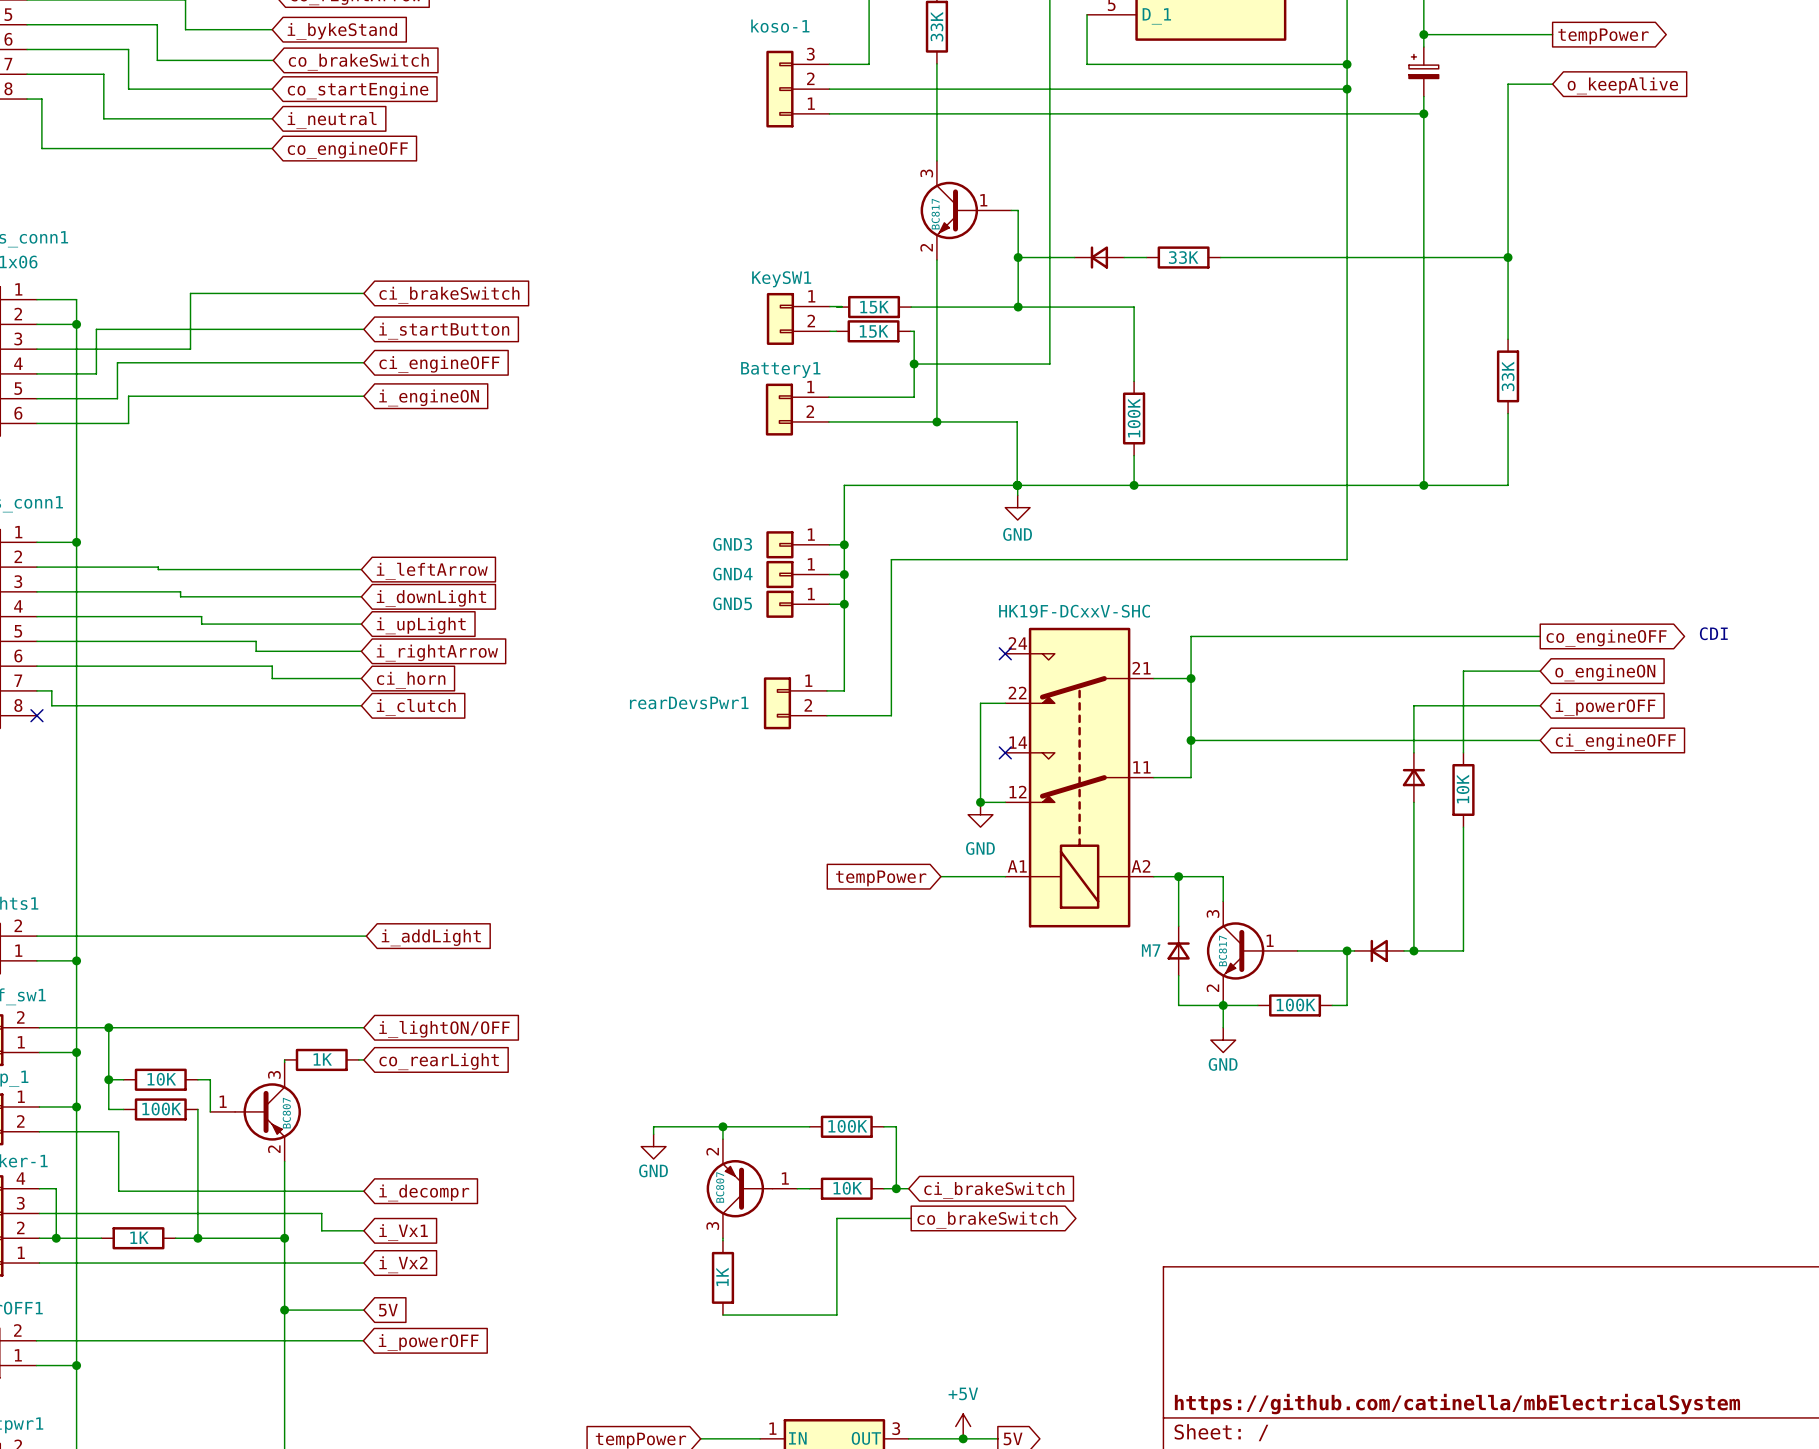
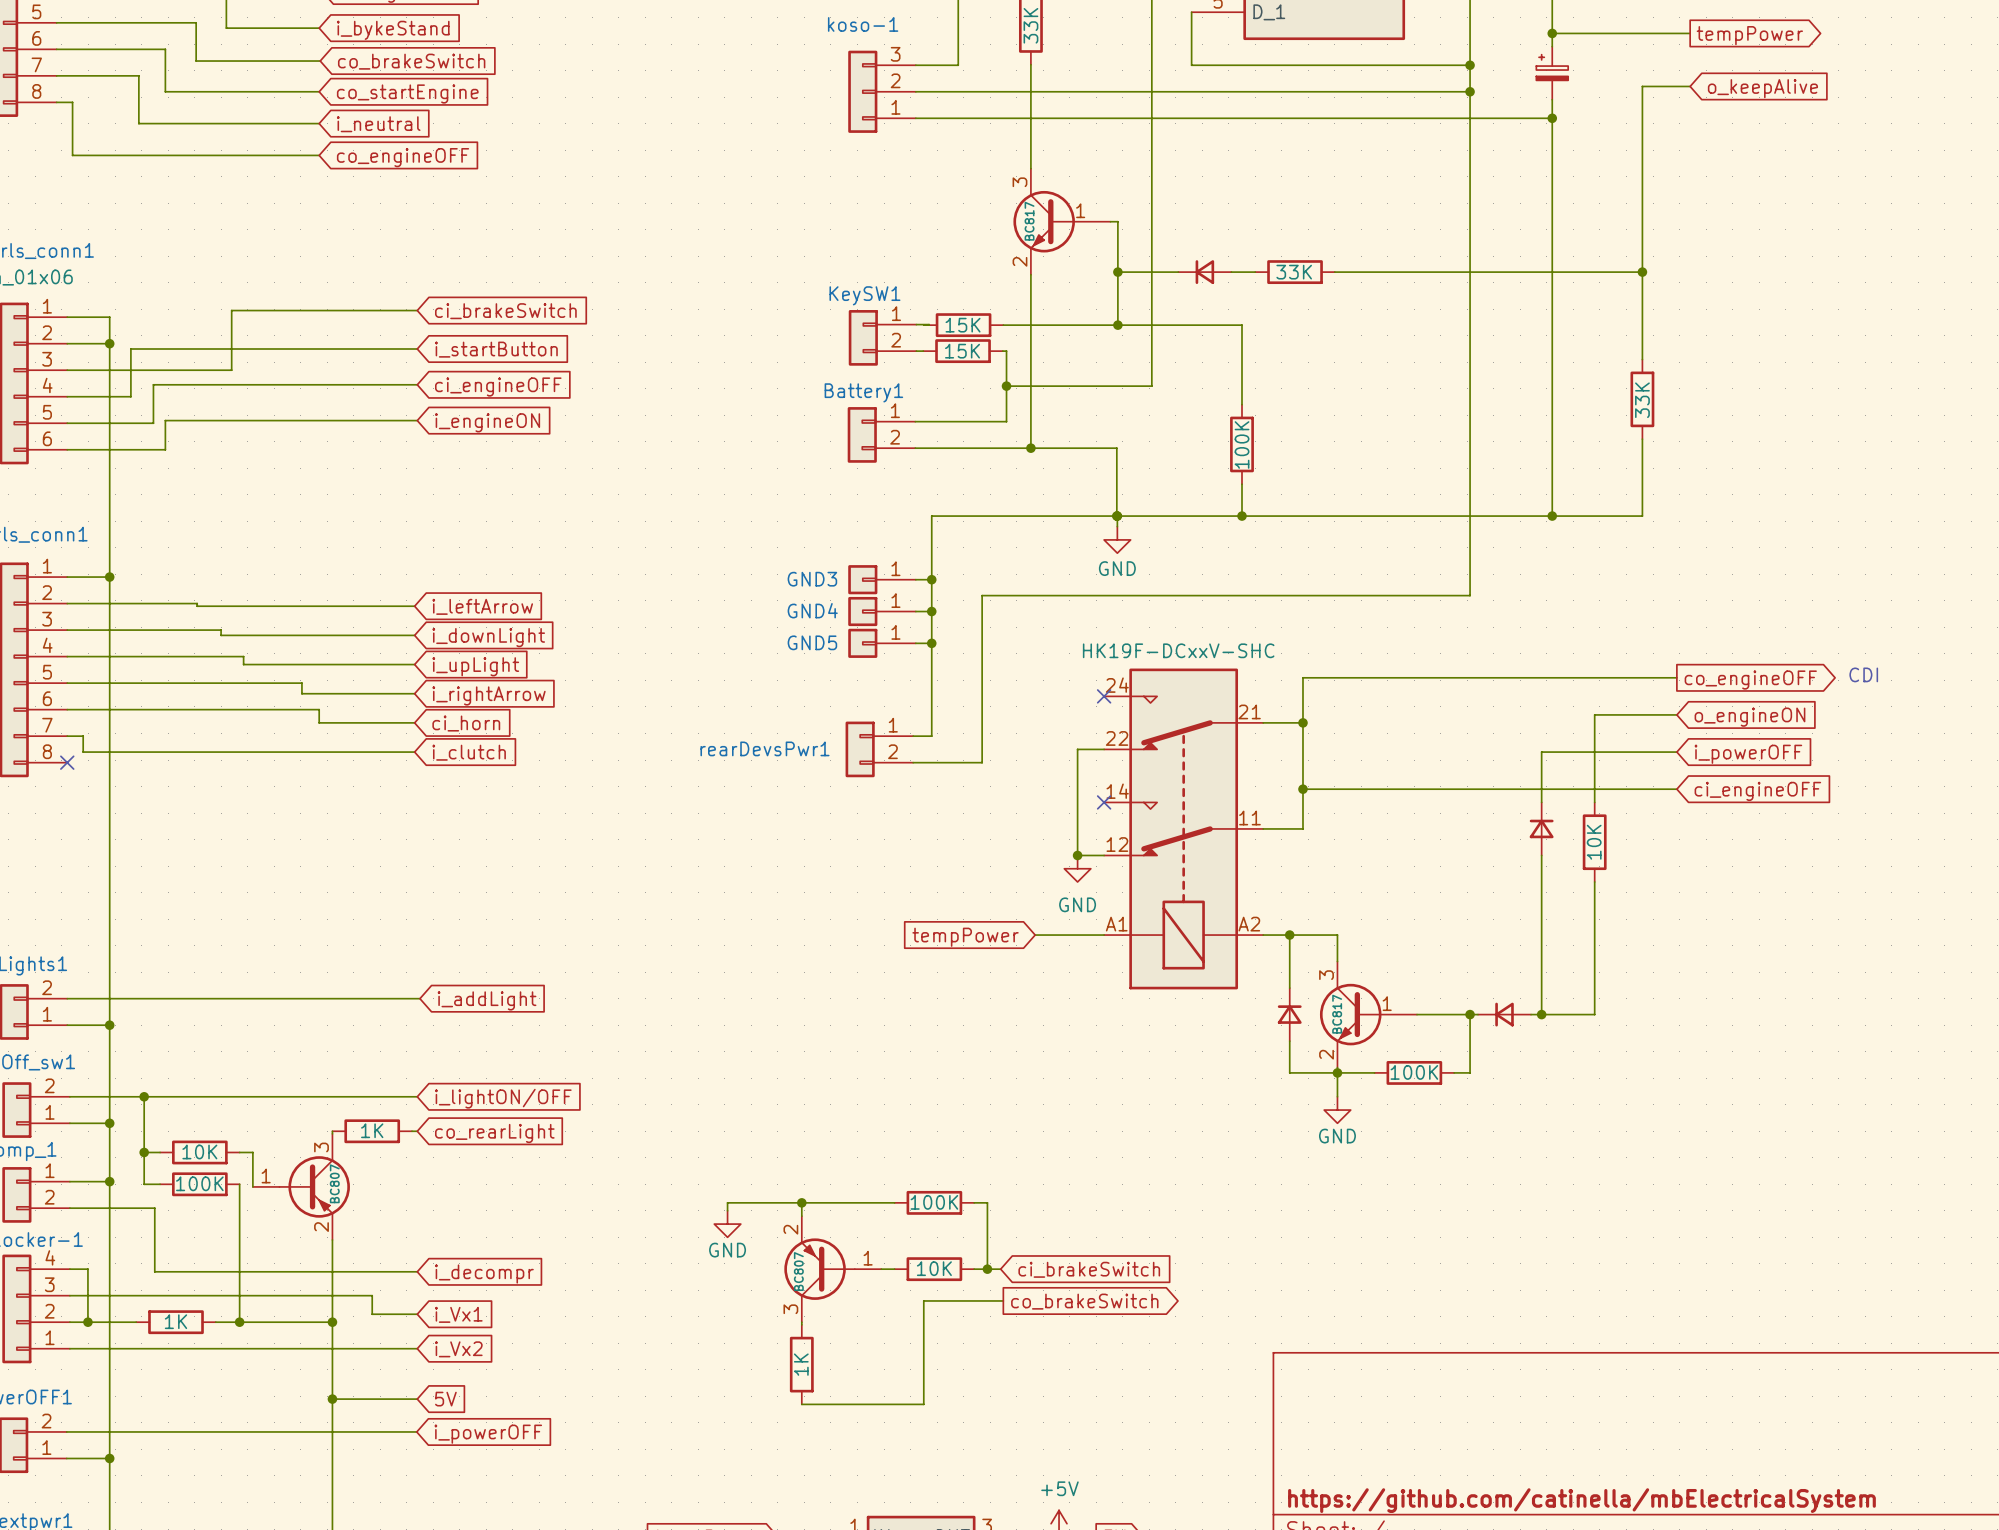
part value: M7 (1151, 950) -> none

